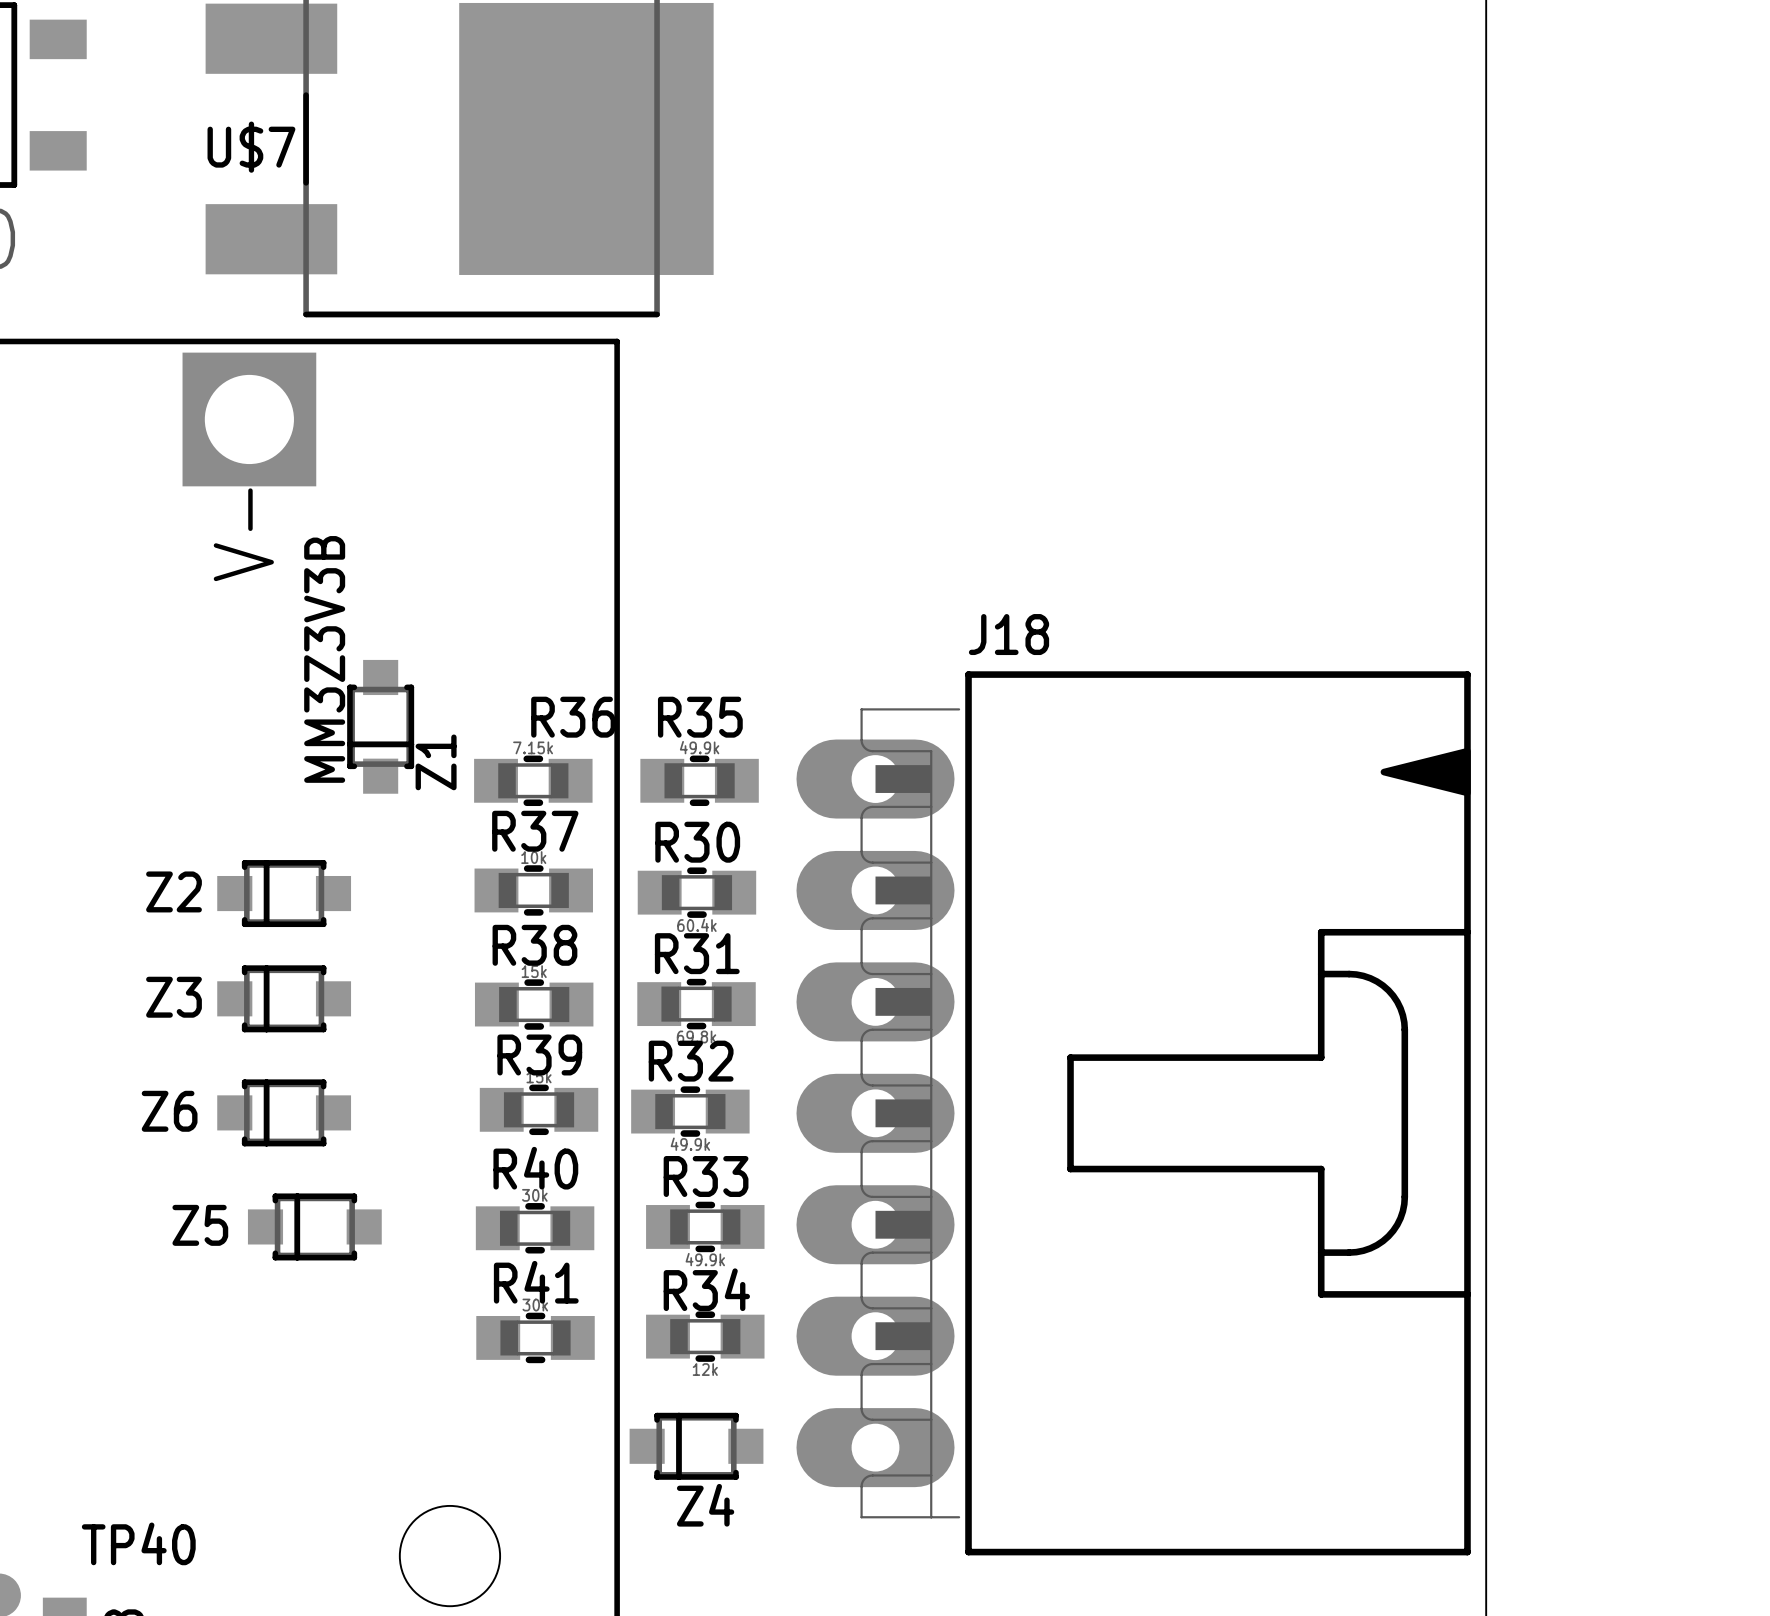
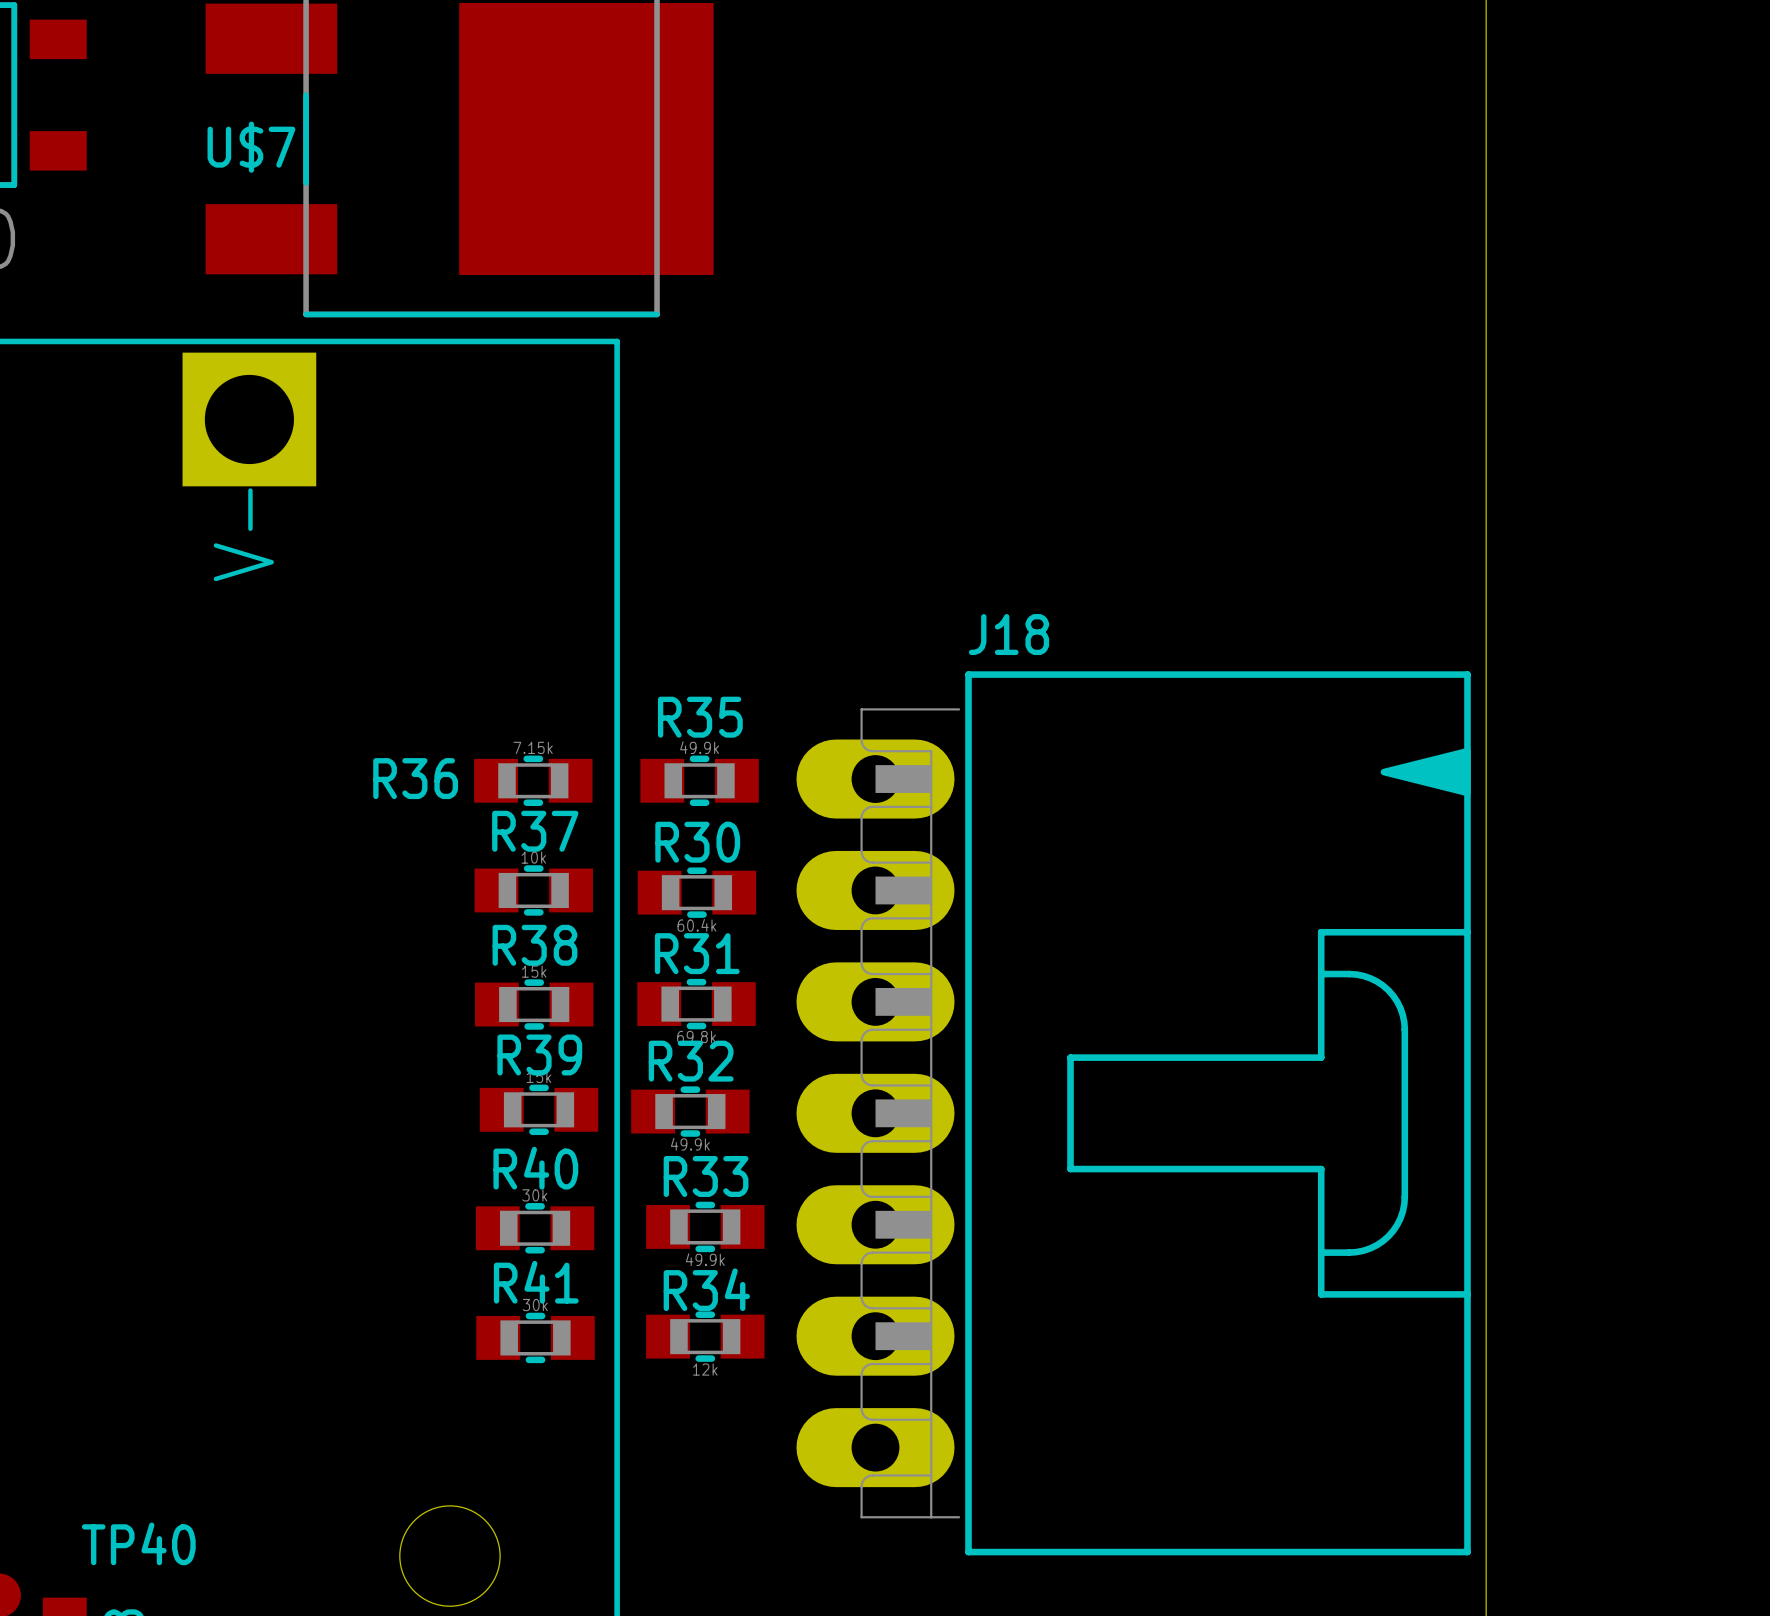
R36 name position: R36 (573, 717) -> R36 (415, 778)
Z1: MM3Z3V3B (380, 726) -> none
Z2: (284, 893) -> none
Z3: (284, 998) -> none
Z6: (284, 1112) -> none
Z5: (314, 1226) -> none
Z4: (696, 1446) -> none

